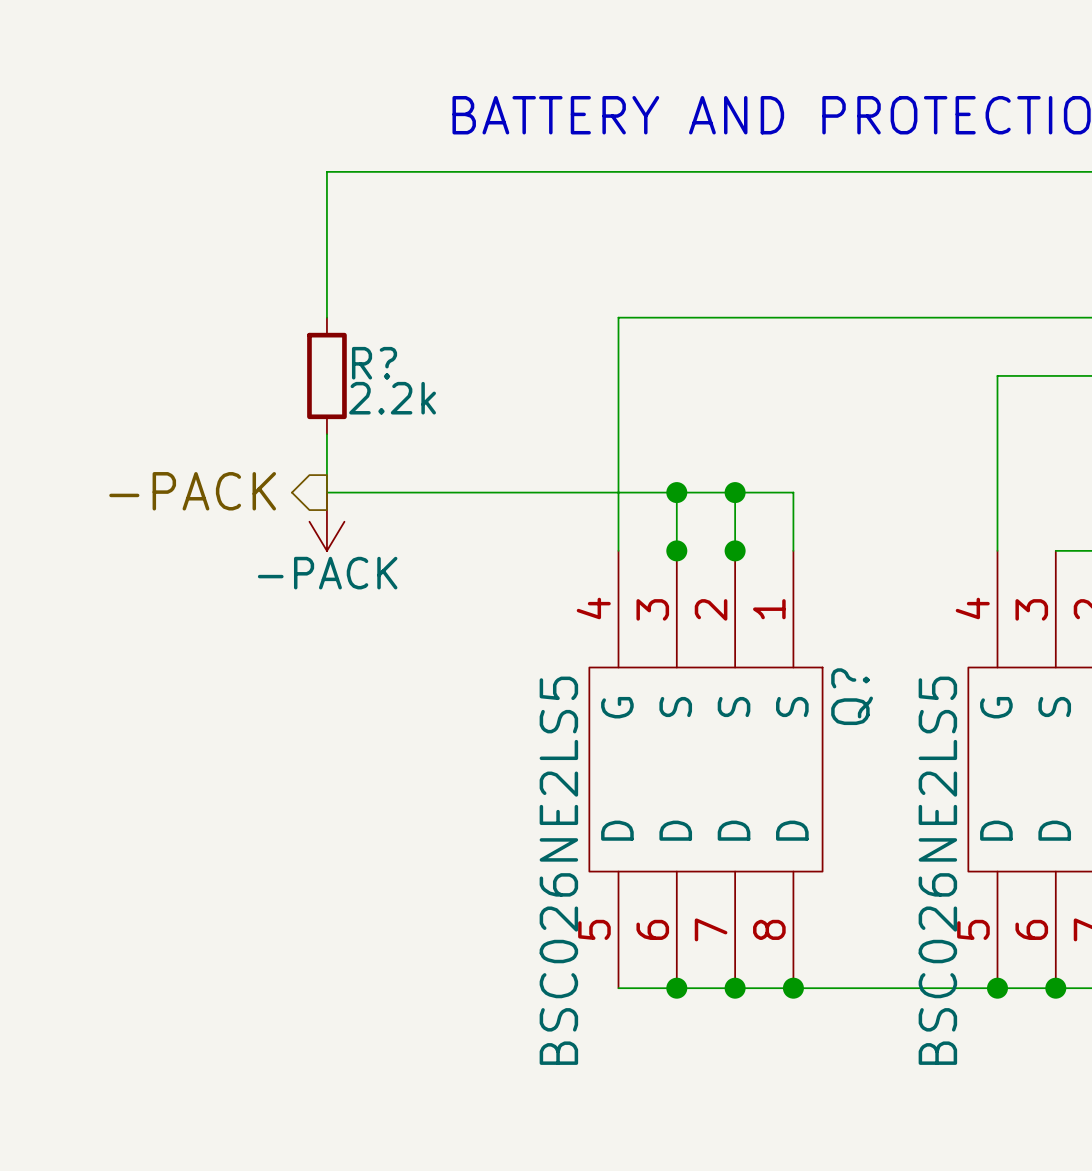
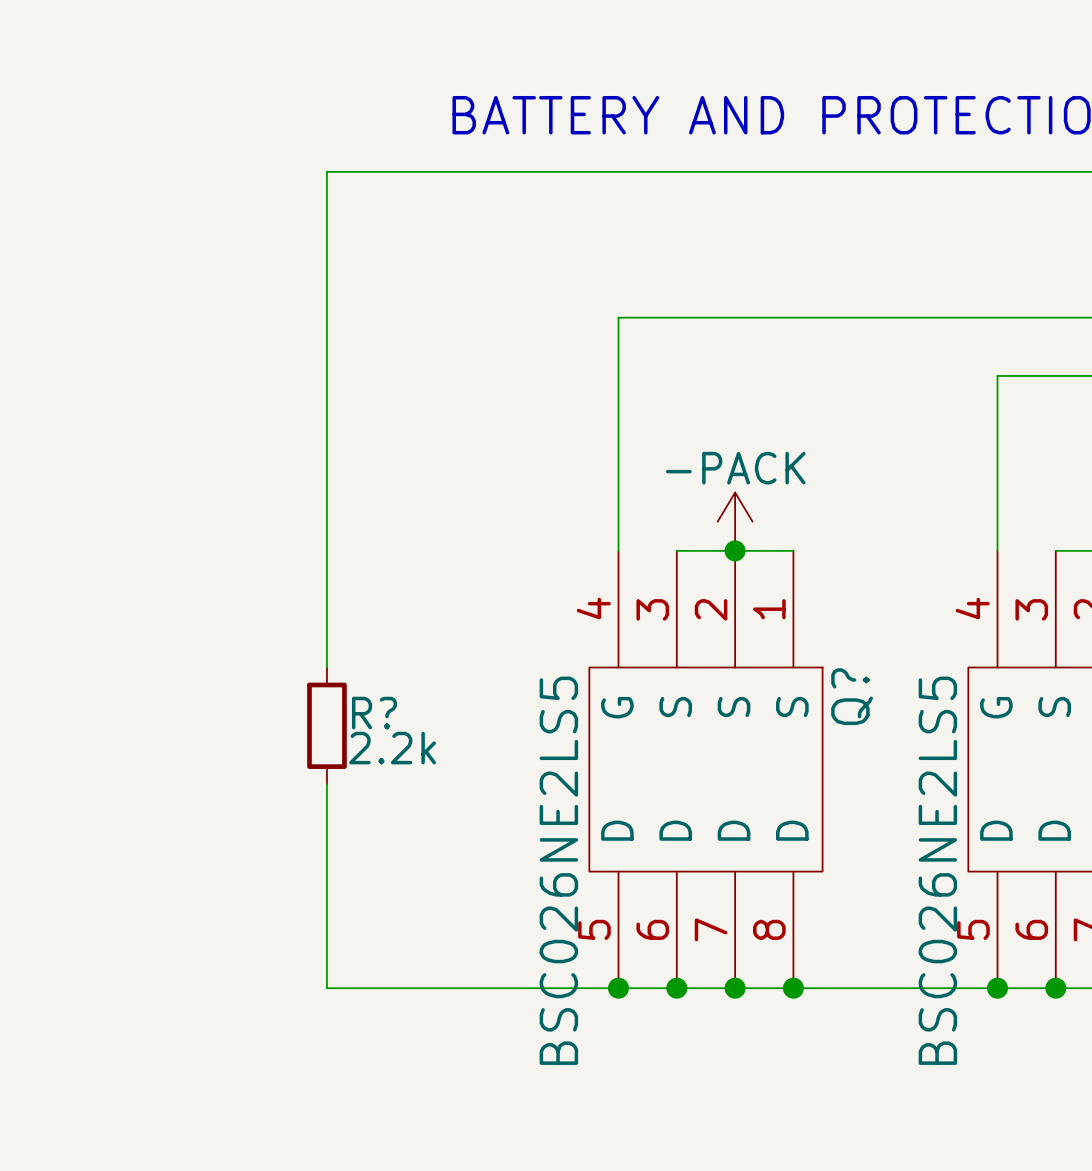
wire: none -> (326, 317) (326, 434)
R? position: (326, 375) -> (326, 725)
hierarchical label: -PACK (192, 491) -> none
wire: (326, 492) (793, 492) (793, 550) -> (326, 492) (326, 667)
wire: (676, 492) (676, 550) -> (793, 550) (676, 550)
junction: (676, 492) -> none
junction: (735, 492) -> none
power symbol rotation: 0° (326, 521) -> 180° (735, 521)
power symbol position: -PACK (326, 521) -> -PACK (735, 521)
junction: (676, 550) -> none
wire: none -> (326, 784) (326, 988) (618, 988)
junction: none -> (618, 988)

